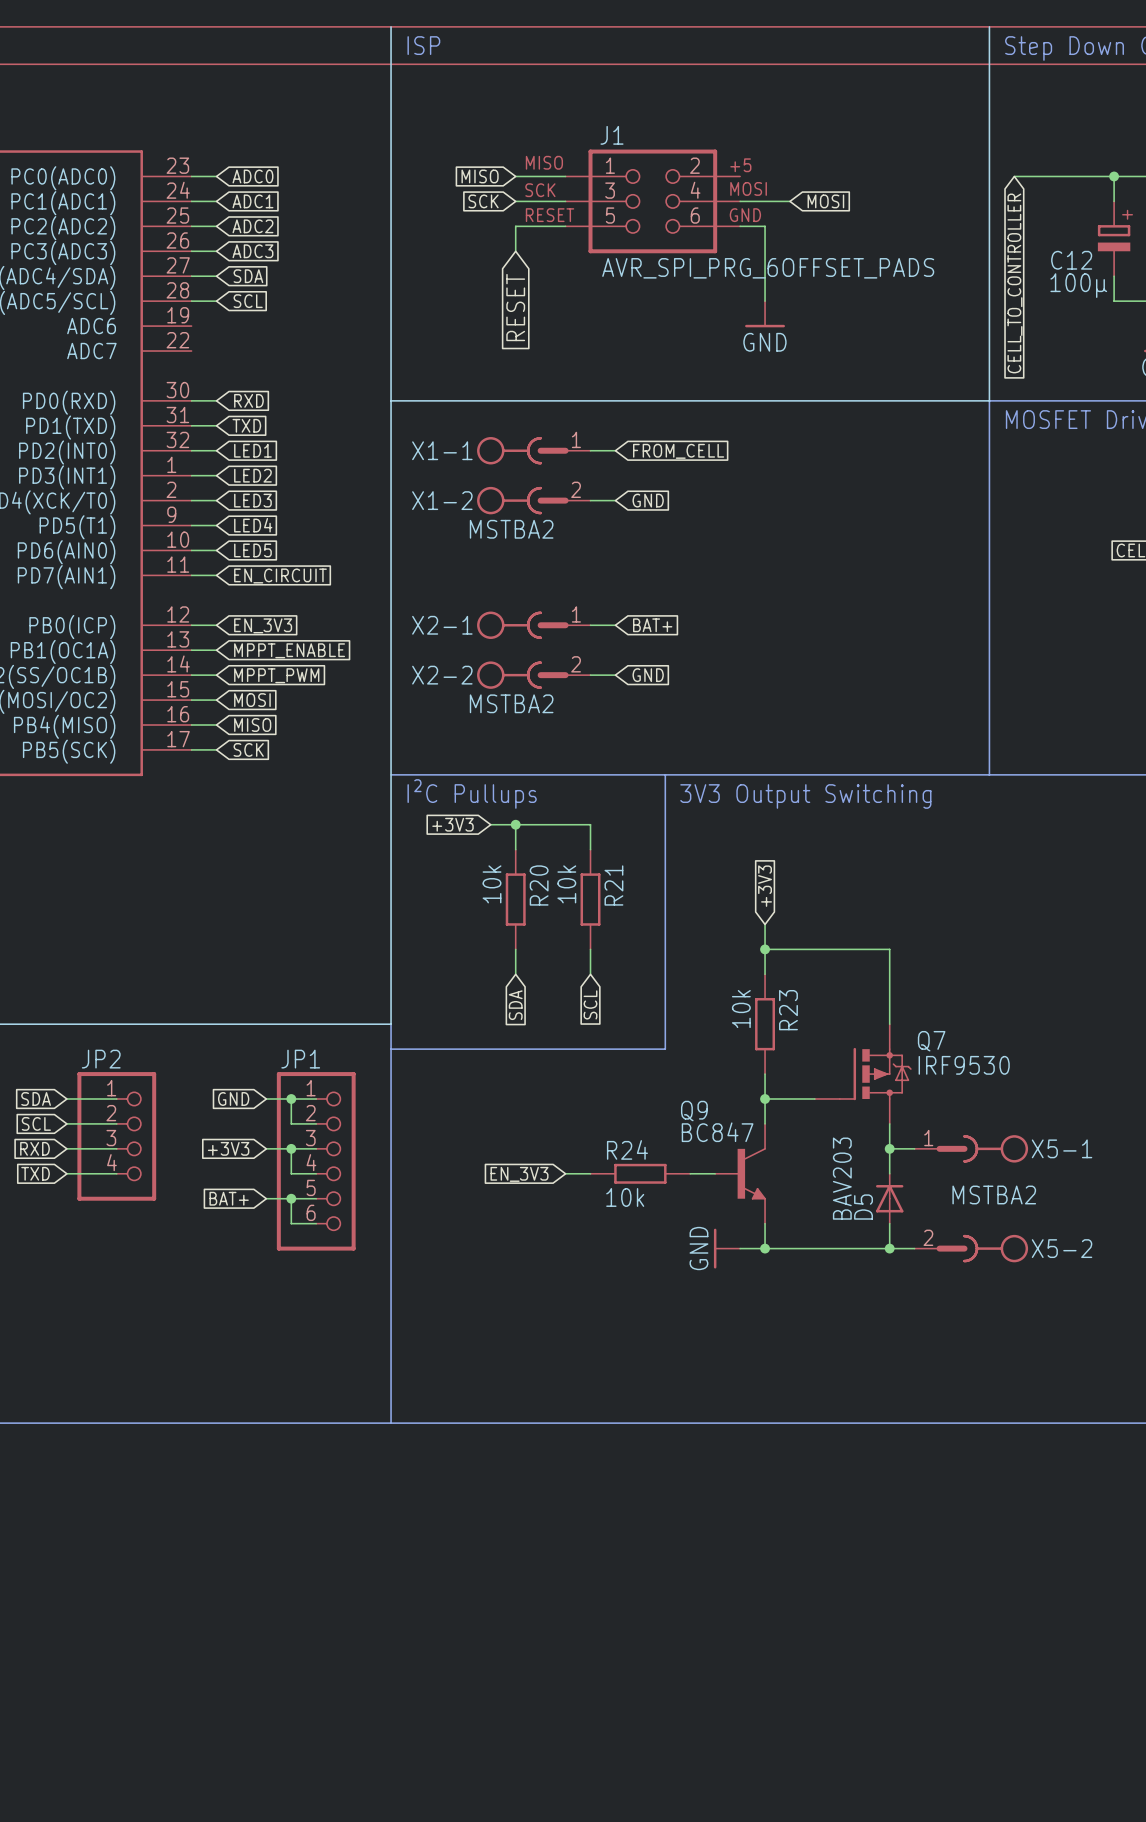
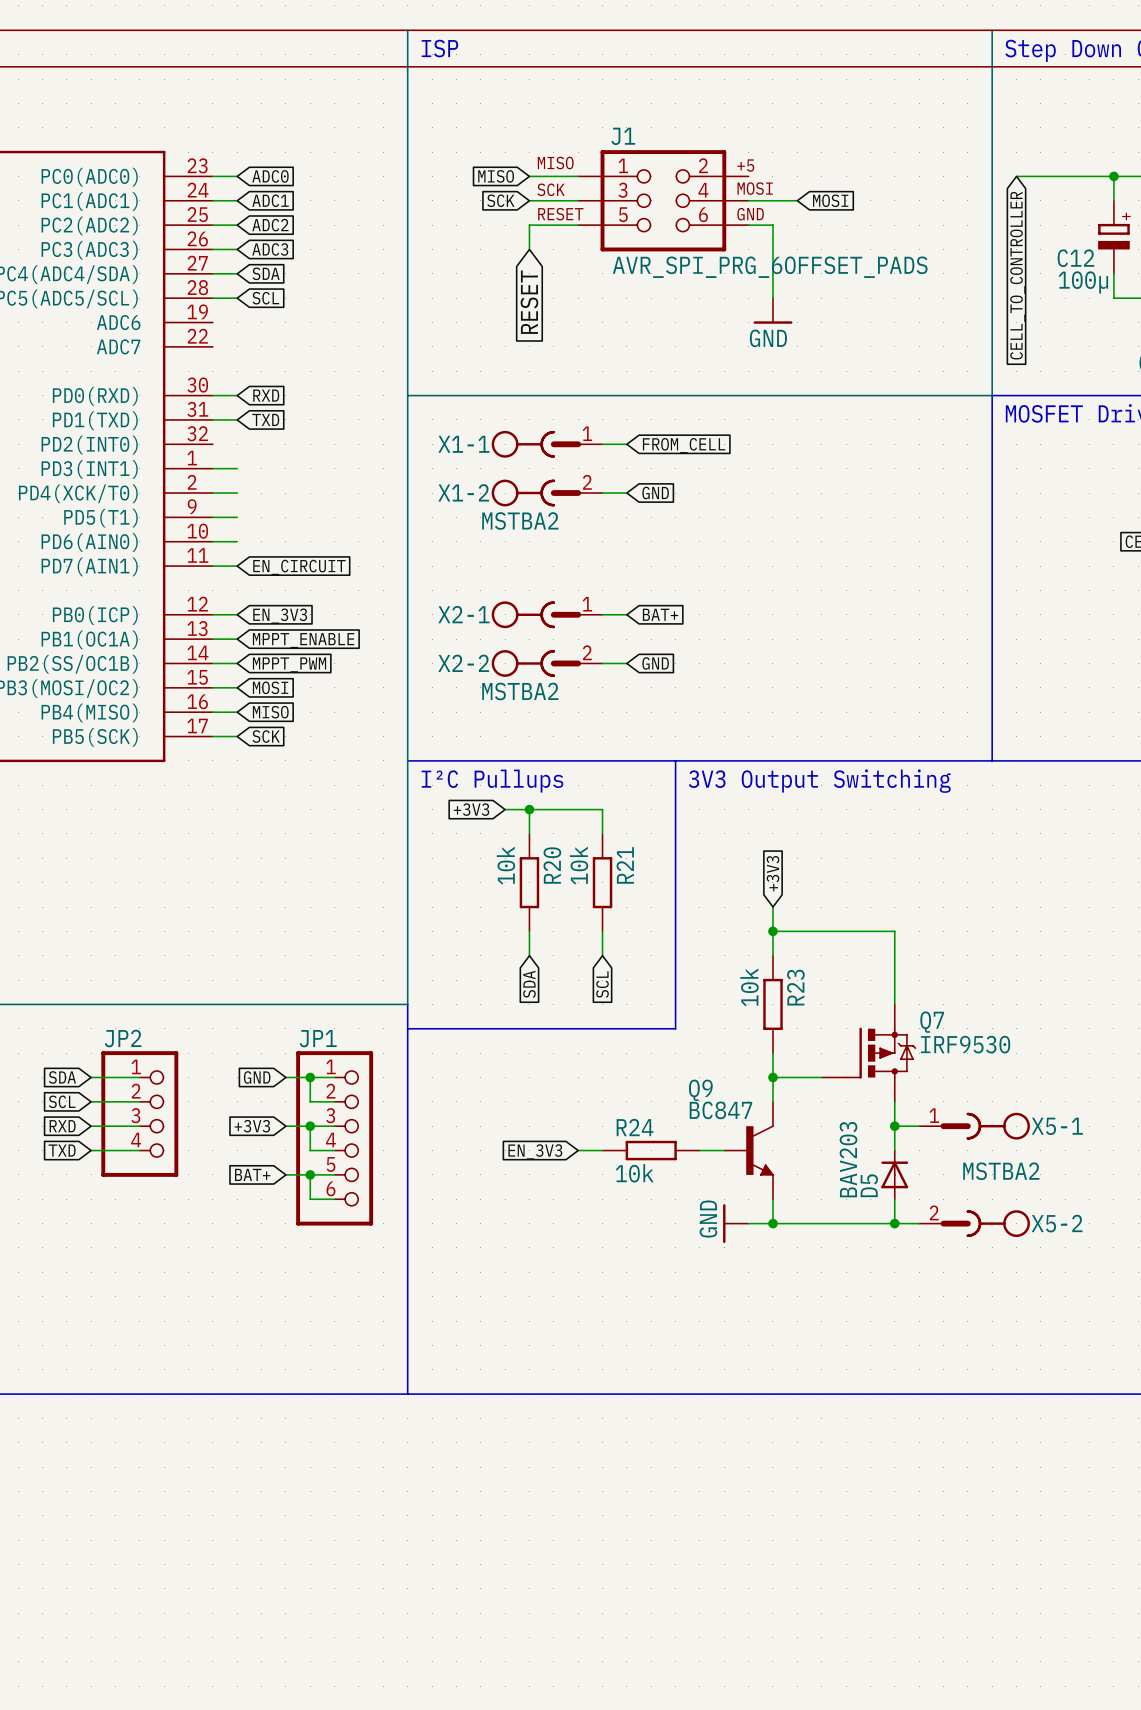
wire: (191, 450) (216, 450) -> none
global label: LED1 (252, 450) -> none
global label: LED2 (252, 475) -> none
global label: LED3 (252, 500) -> none
global label: LED4 (253, 525) -> none
global label: LED5 (252, 550) -> none

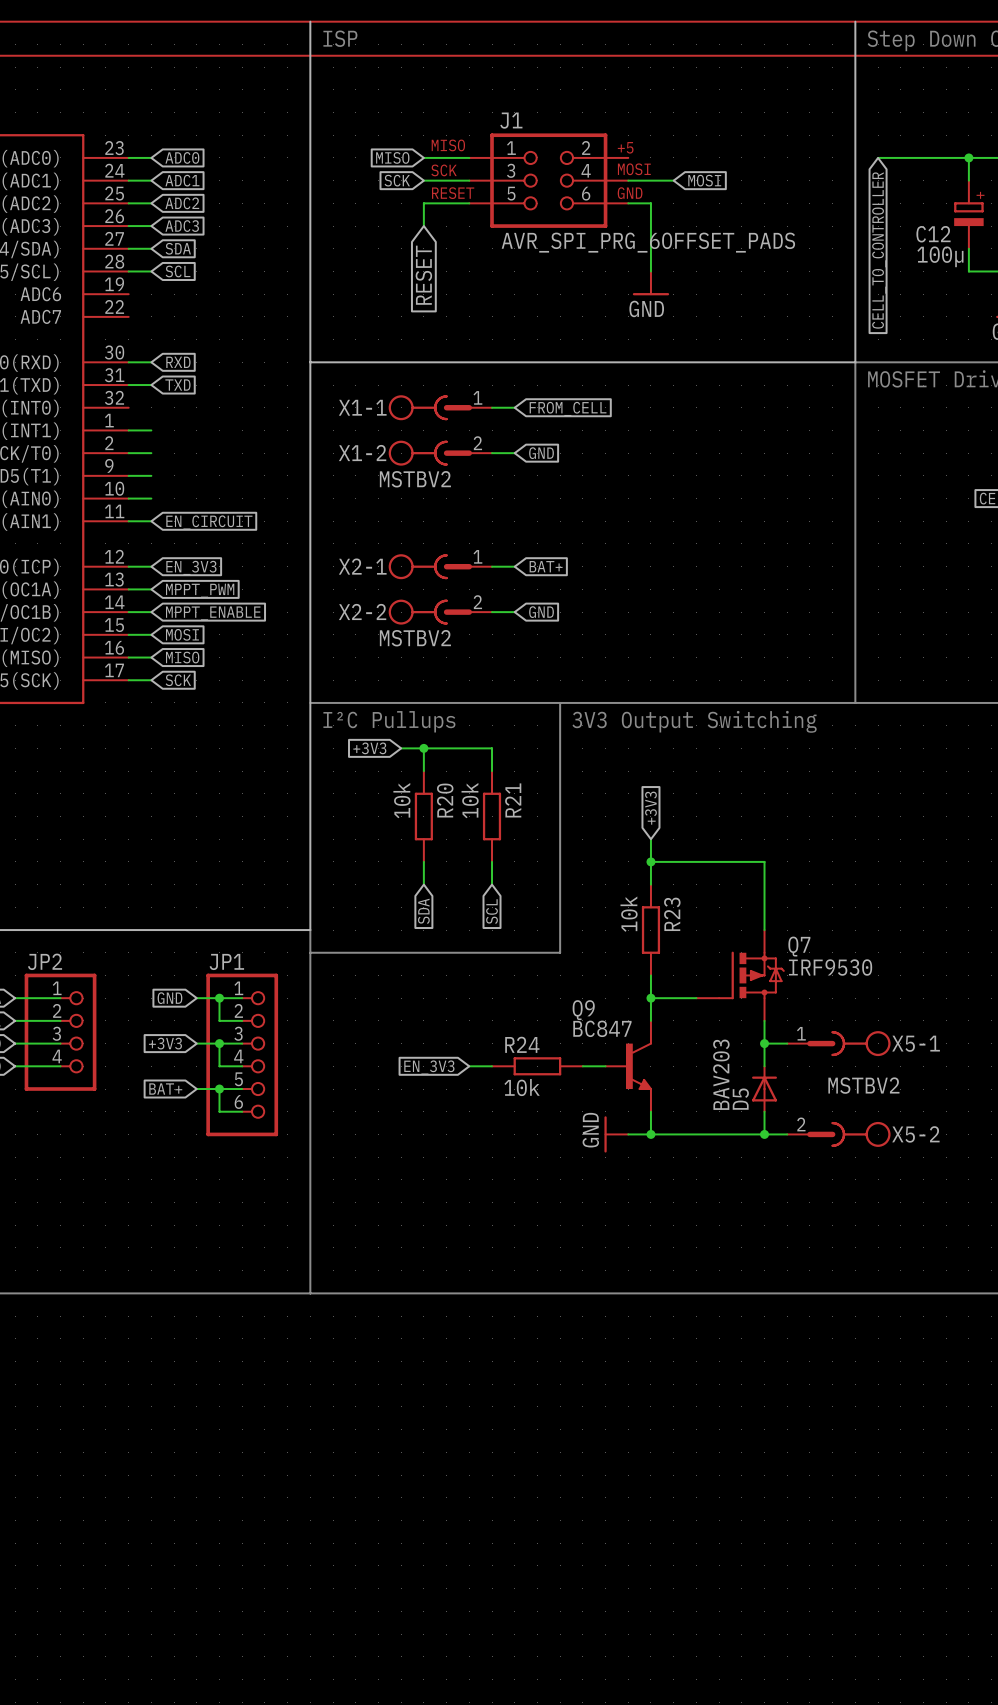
X1-2 value: MSTBA2 (520, 521) -> MSTBV2 (415, 479)
global label: MPPT_ENABLE (303, 640) -> MPPT_PWM (200, 590)
global label: MPPT_PWM (289, 664) -> MPPT_ENABLE (213, 613)
X2-2 value: MSTBA2 (520, 691) -> MSTBV2 (415, 638)
X5-2 value: MSTBA2 (1001, 1171) -> MSTBV2 (863, 1085)

